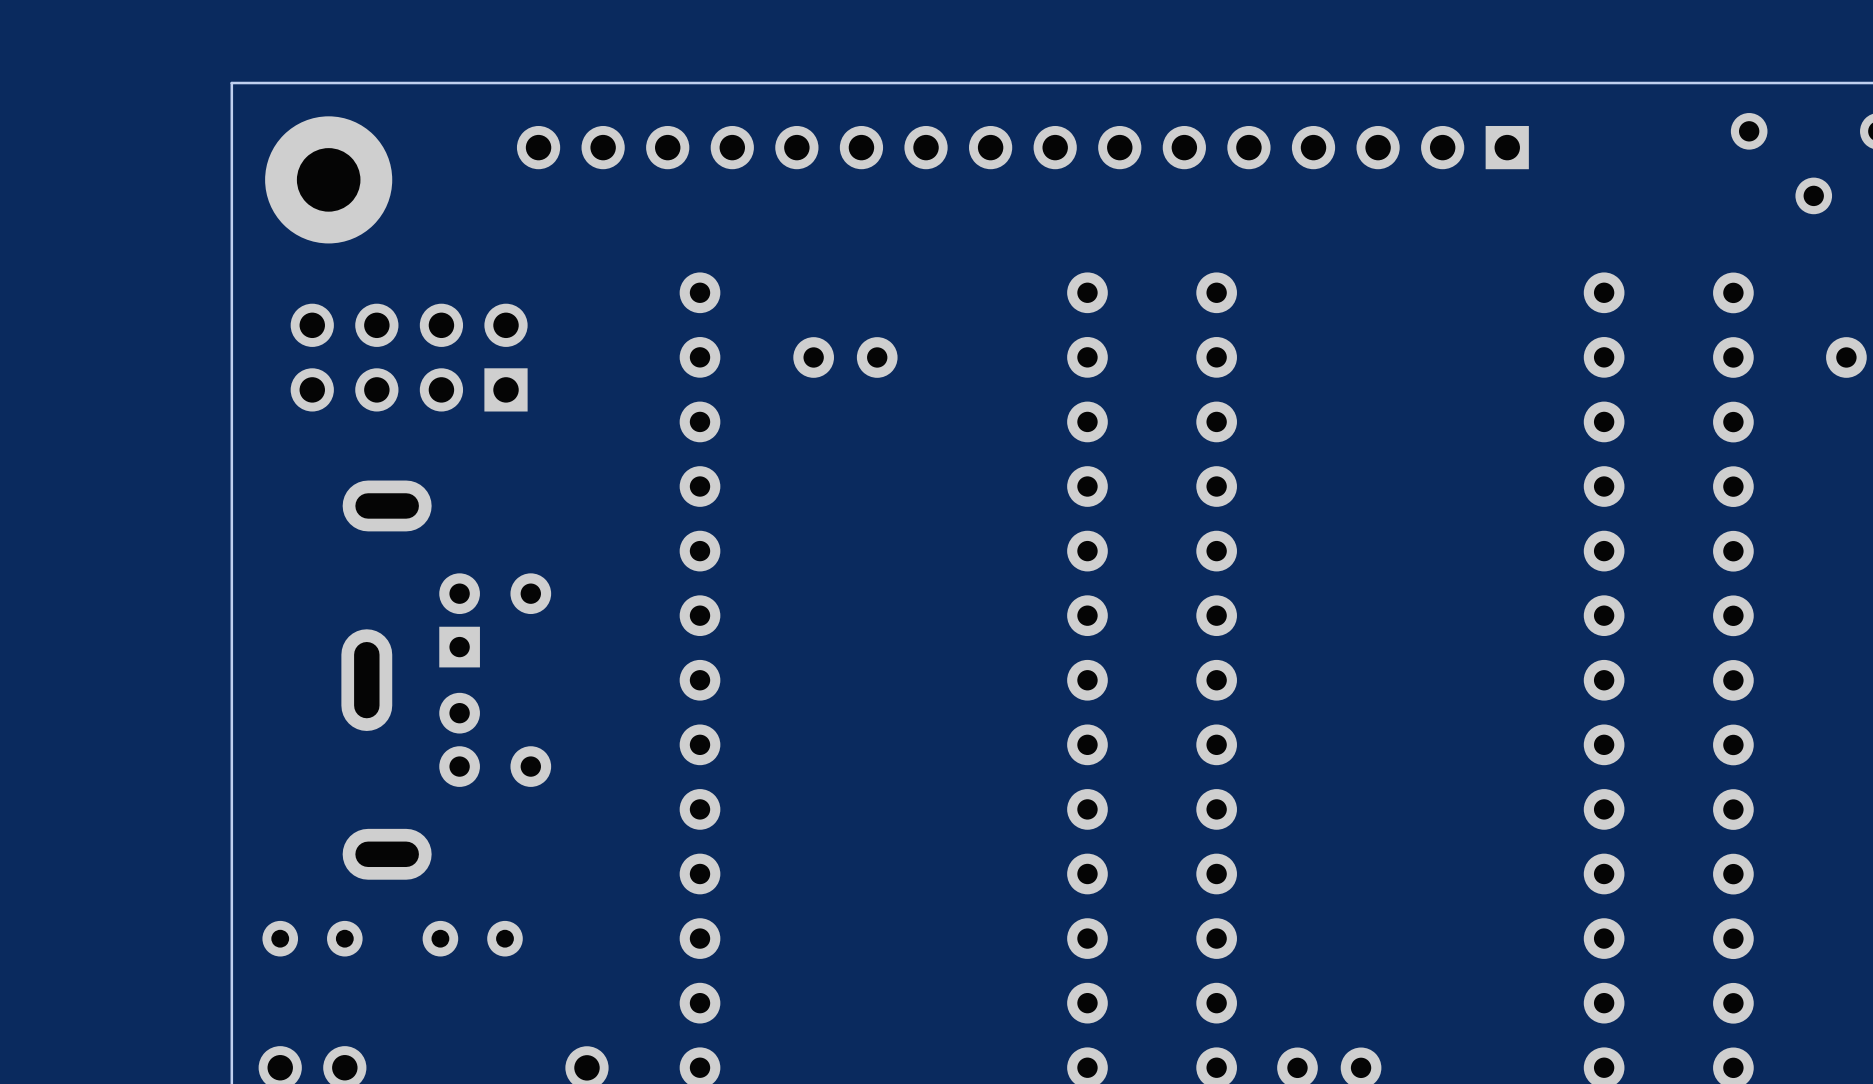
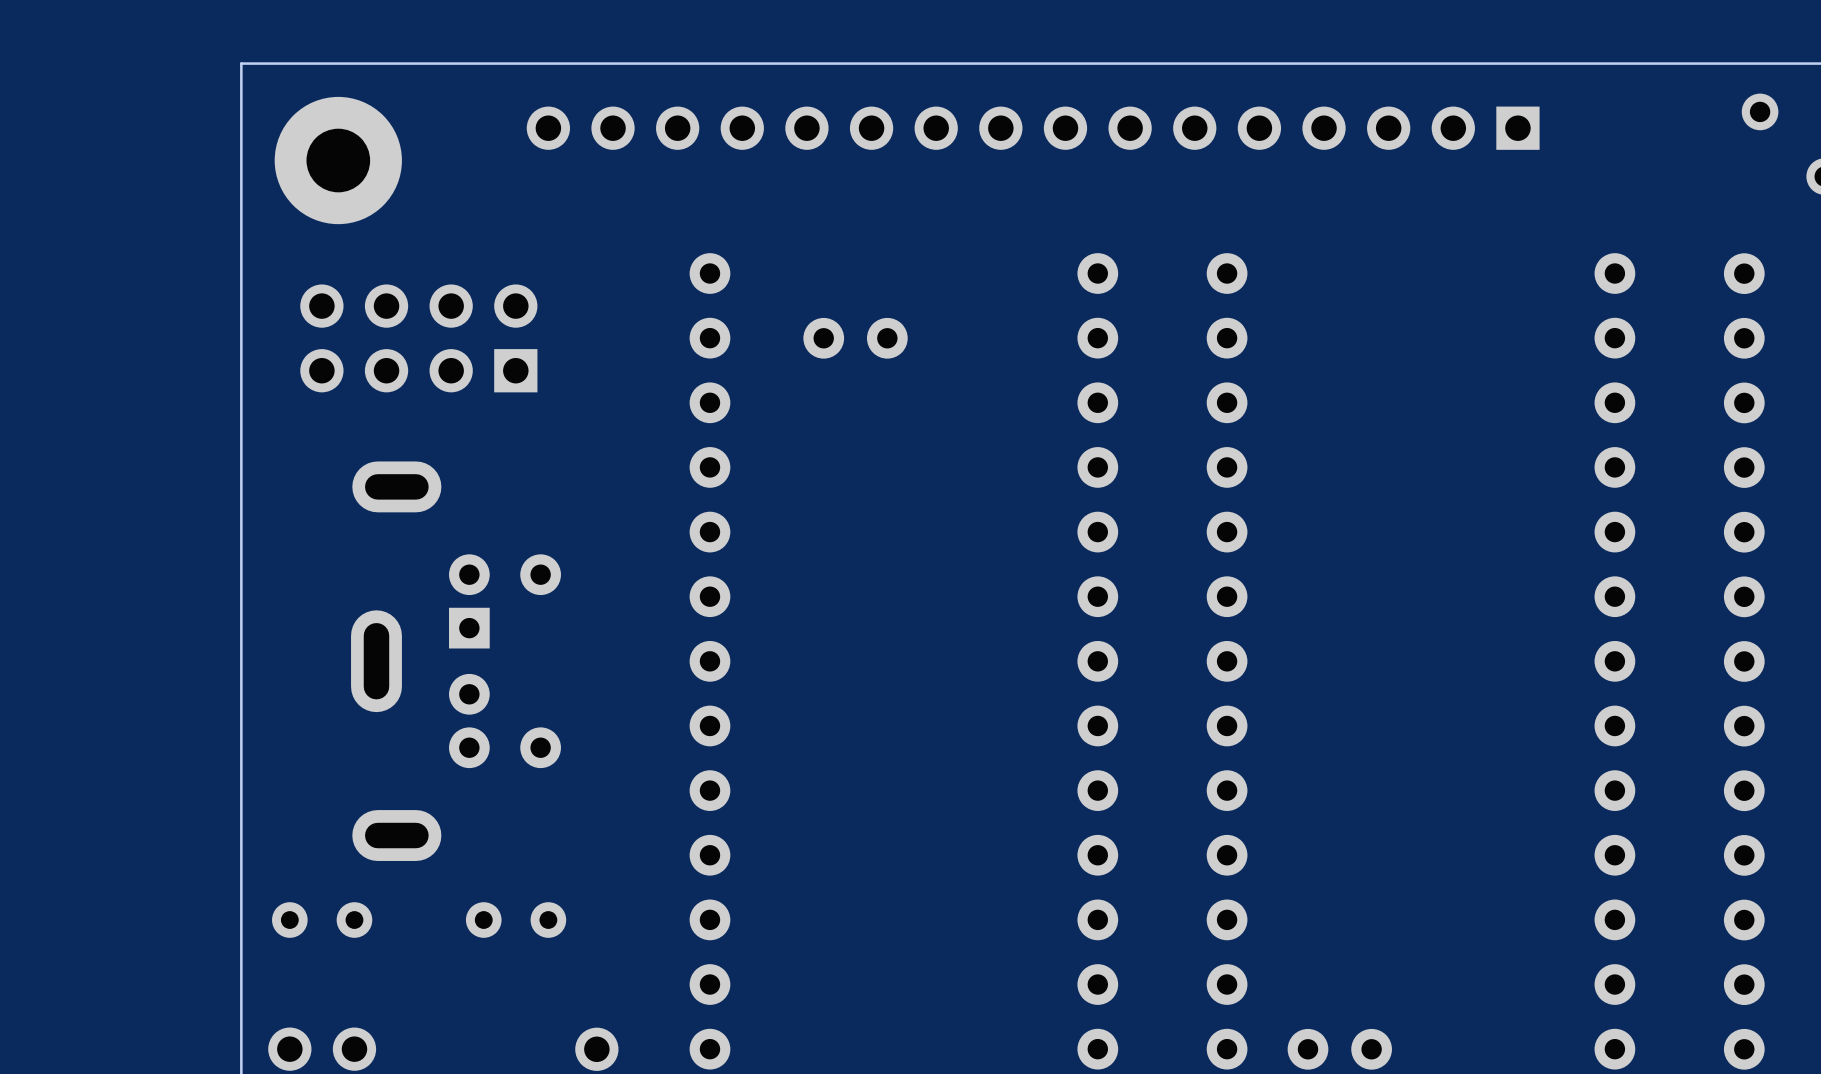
part position: (472, 938) -> (516, 920)

